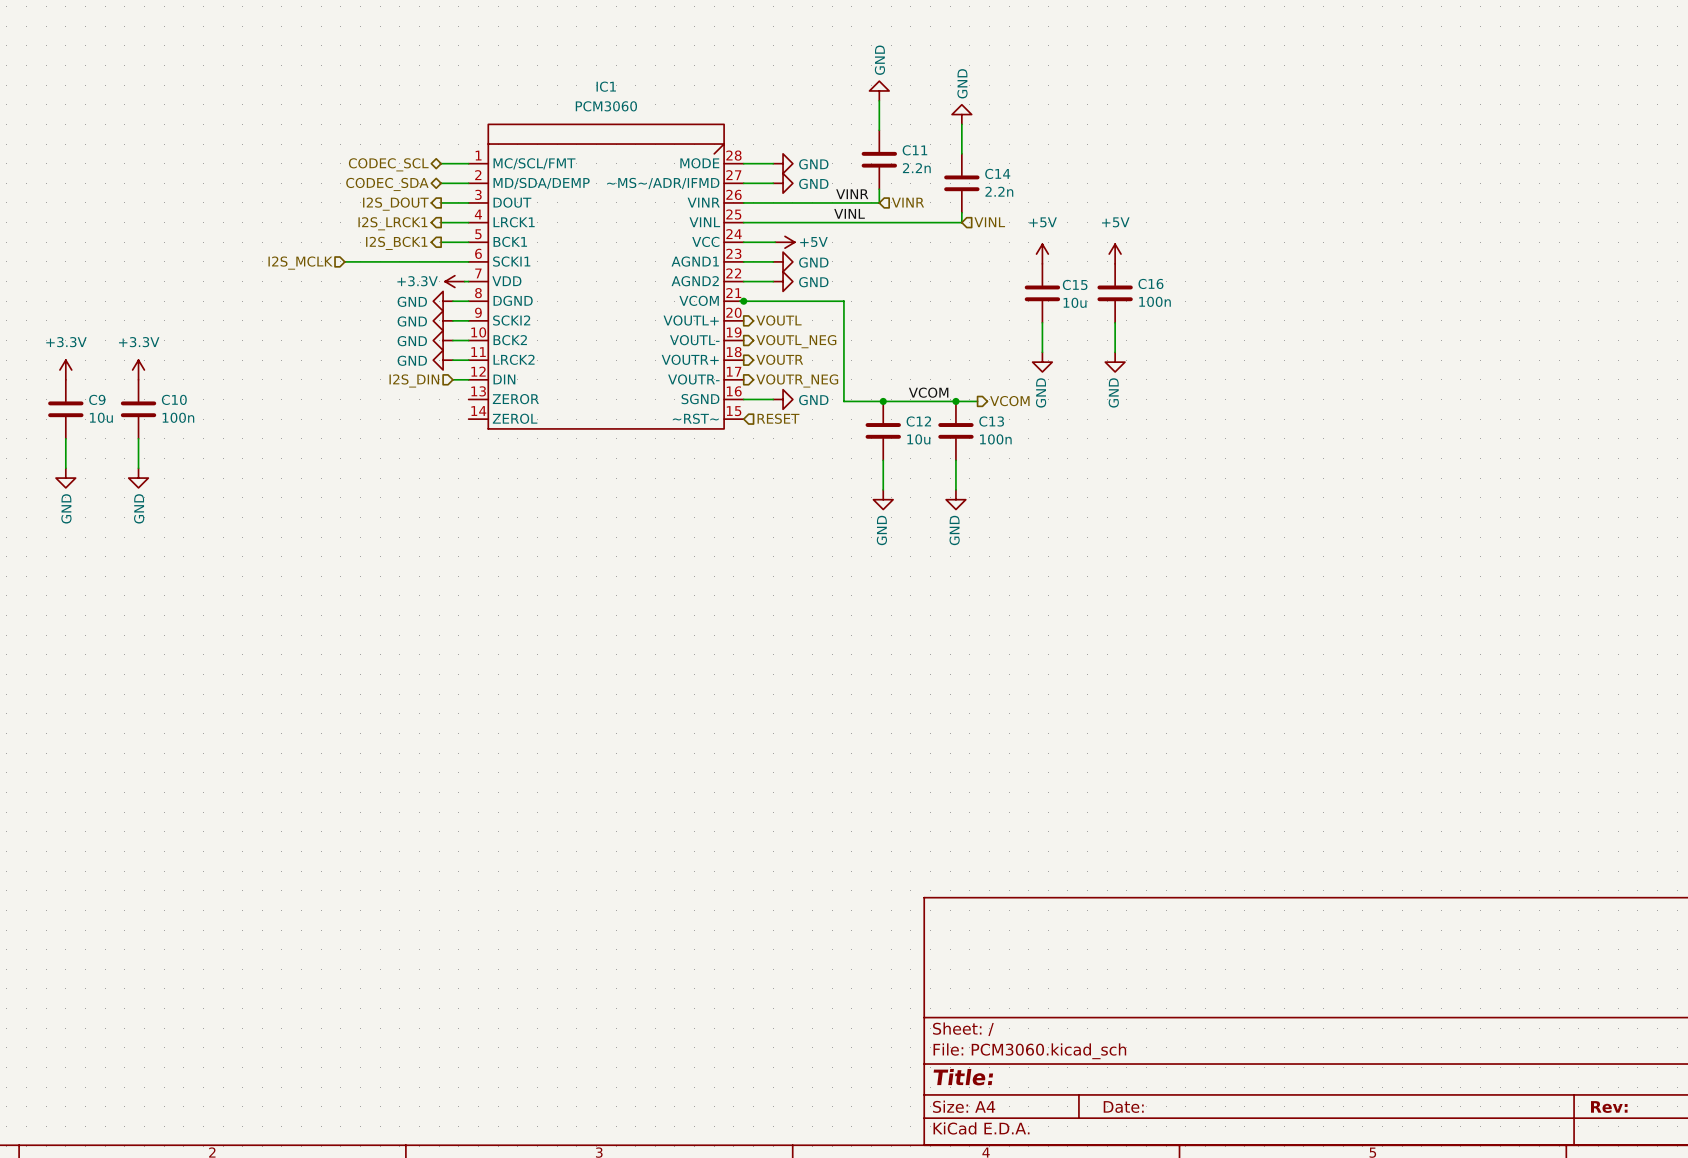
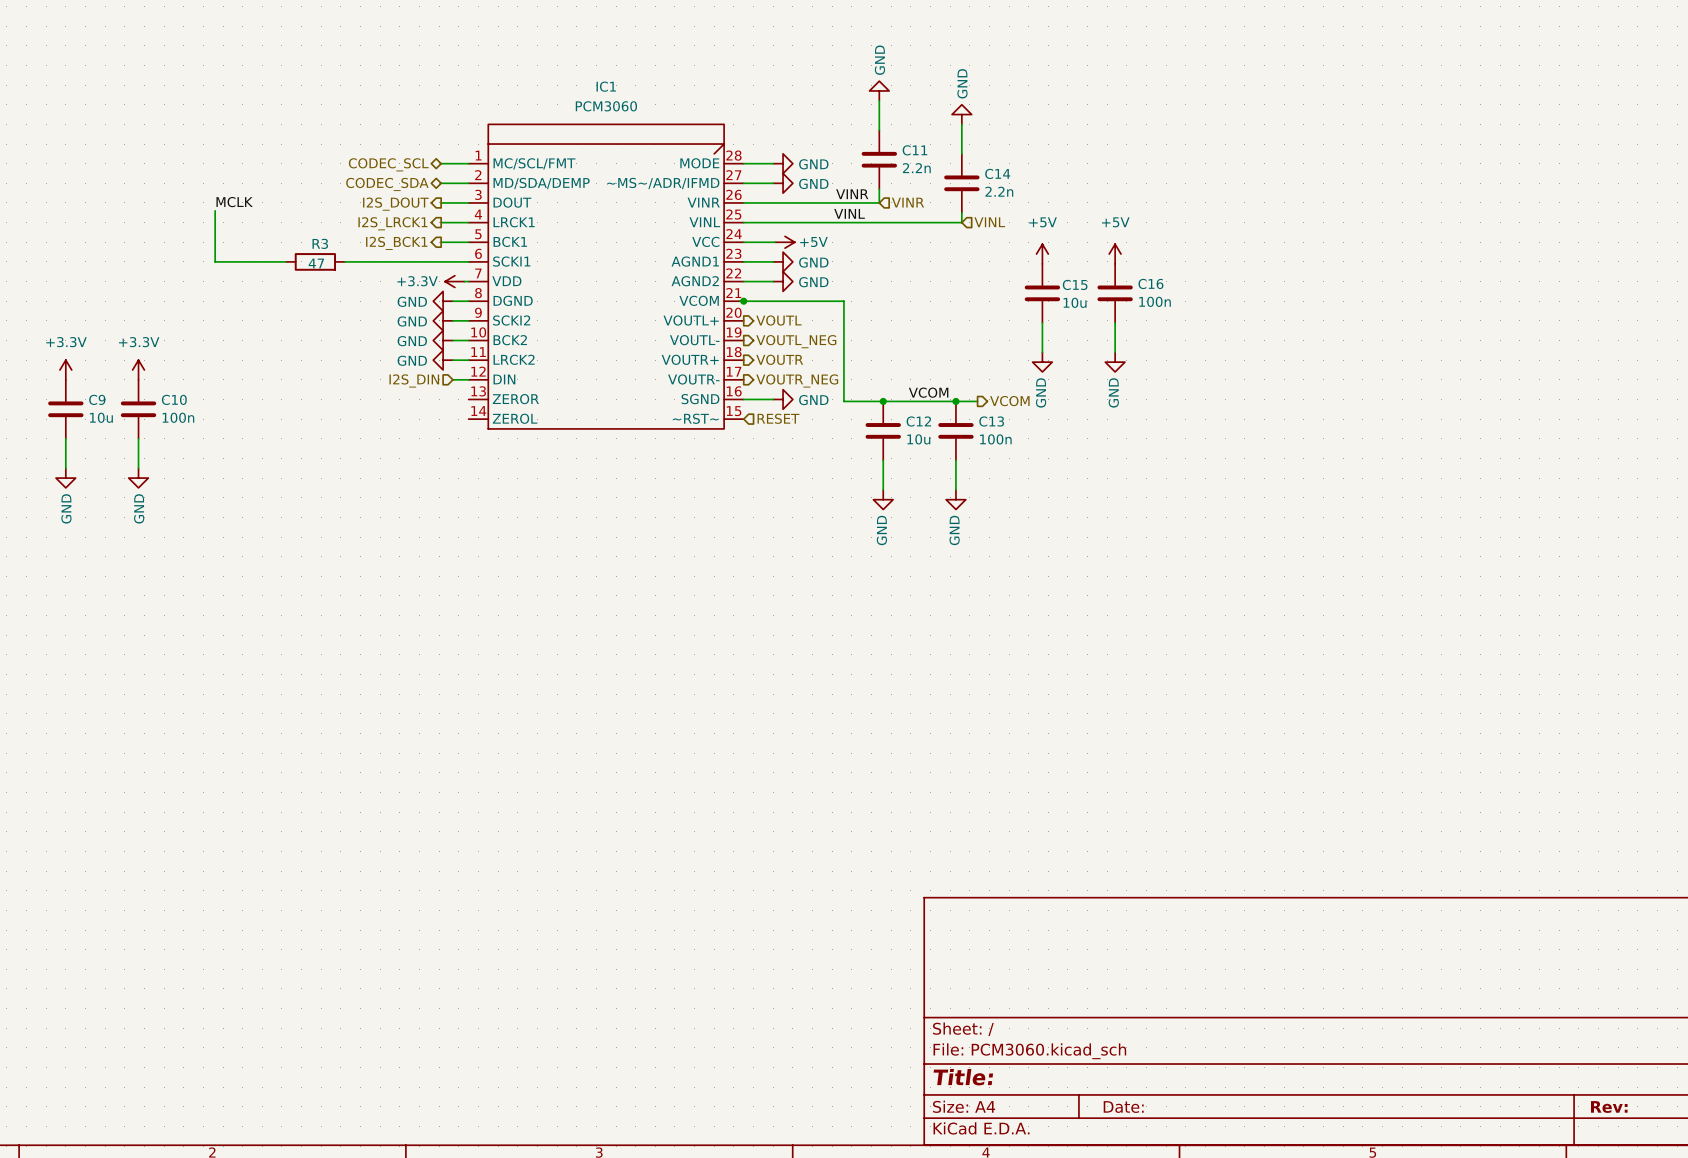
label: none -> MCLK (234, 202)
wire: none -> (215, 210) (215, 261) (285, 261)
R3: none -> 47 (315, 261)
hierarchical label: I2S_MCLK (300, 263) -> none

